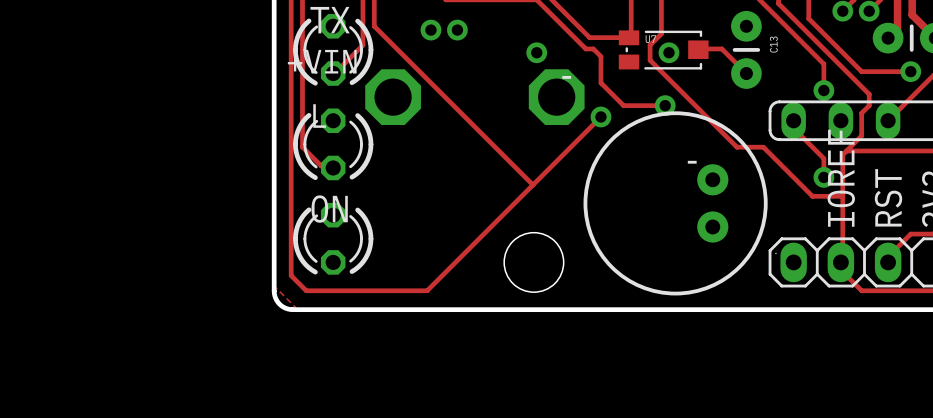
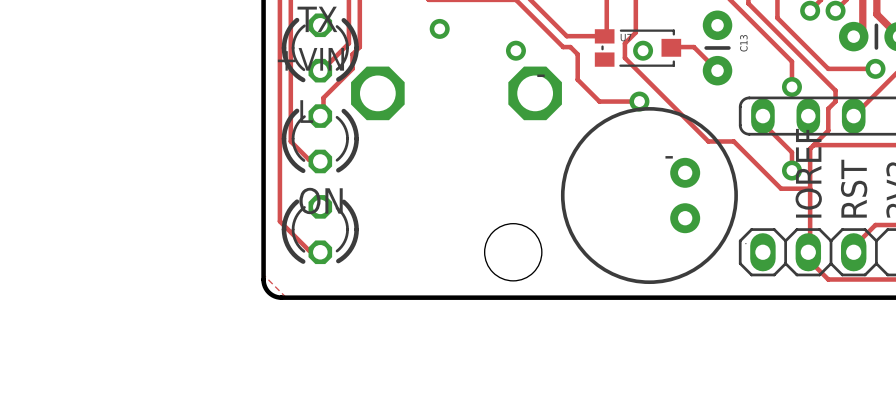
track: (374, 26) (532, 184) -> (359, 25) (359, 47) (352, 54) (352, 68) (323, 97) (323, 116) (320, 116)
via: (430, 30) -> none
track: (600, 116) (427, 290) (306, 290) (291, 275) (291, 230) -> (320, 252) (319, 250) (308, 250) (279, 221)
via: (600, 116) -> none

